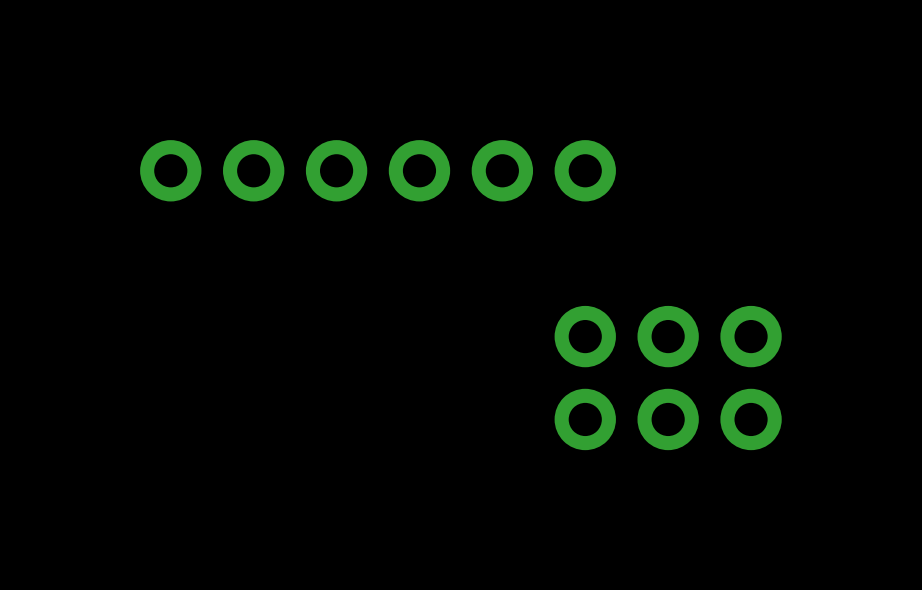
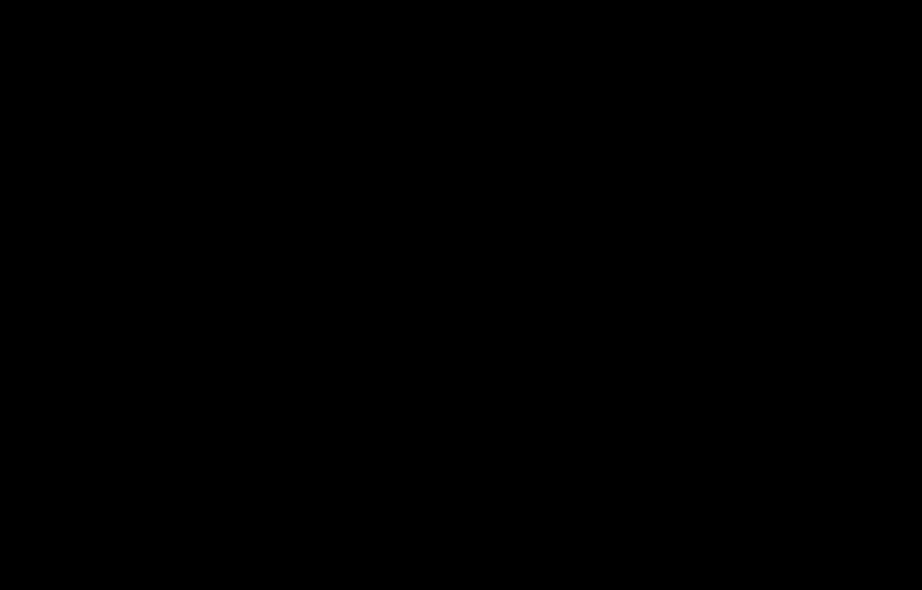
part: (378, 170) -> none
part: (668, 378) -> none

